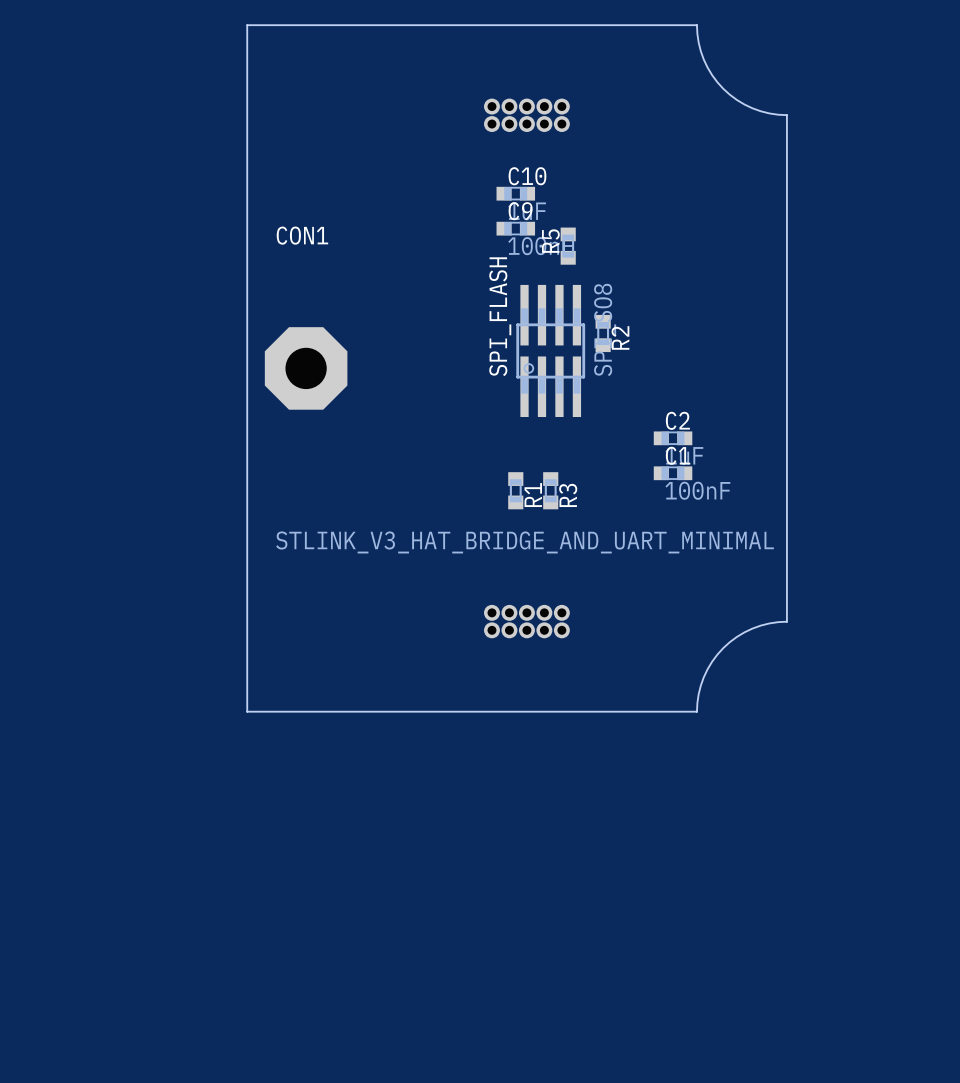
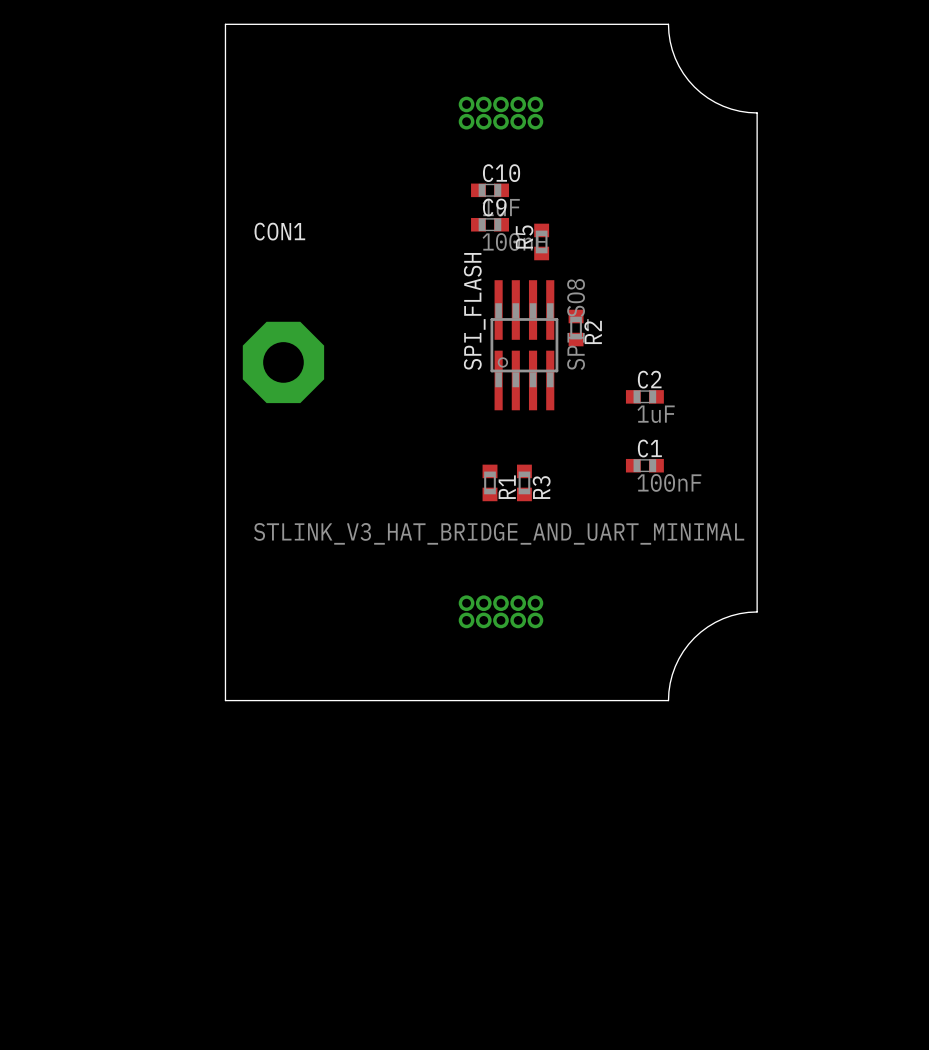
C2 position: (673, 438) -> (644, 396)

